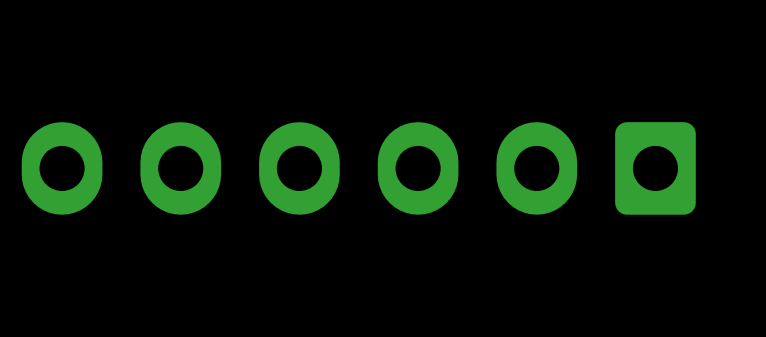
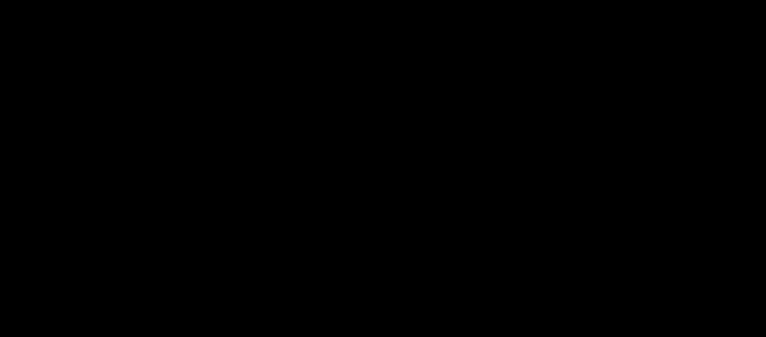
part: (358, 168) -> none

